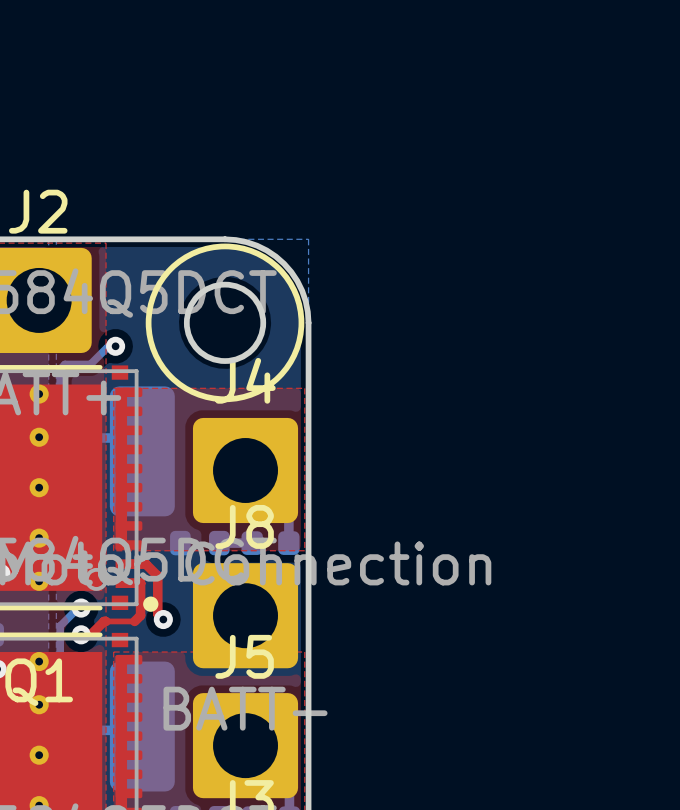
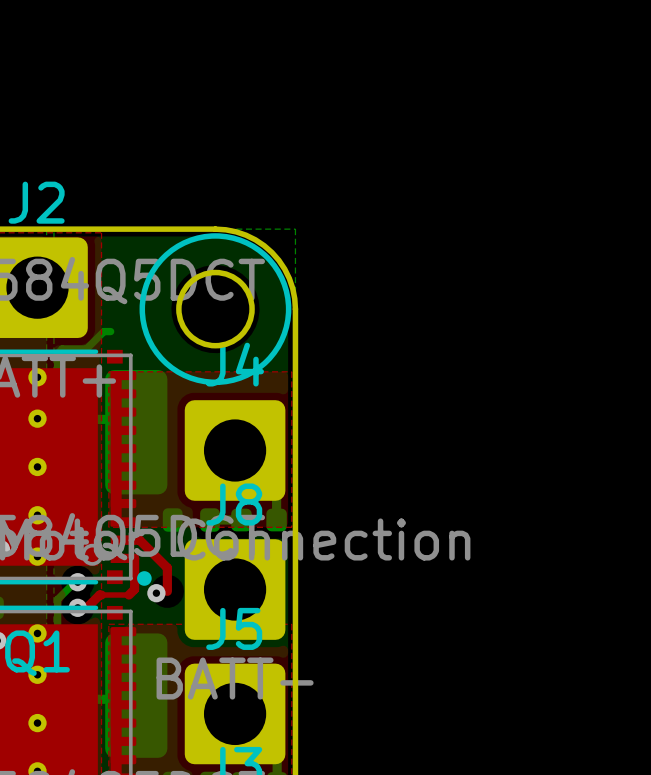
via: (115, 346) -> none
top track: (157, 576) (157, 613) (163, 619) -> (151, 551) (167, 567) (167, 591)

